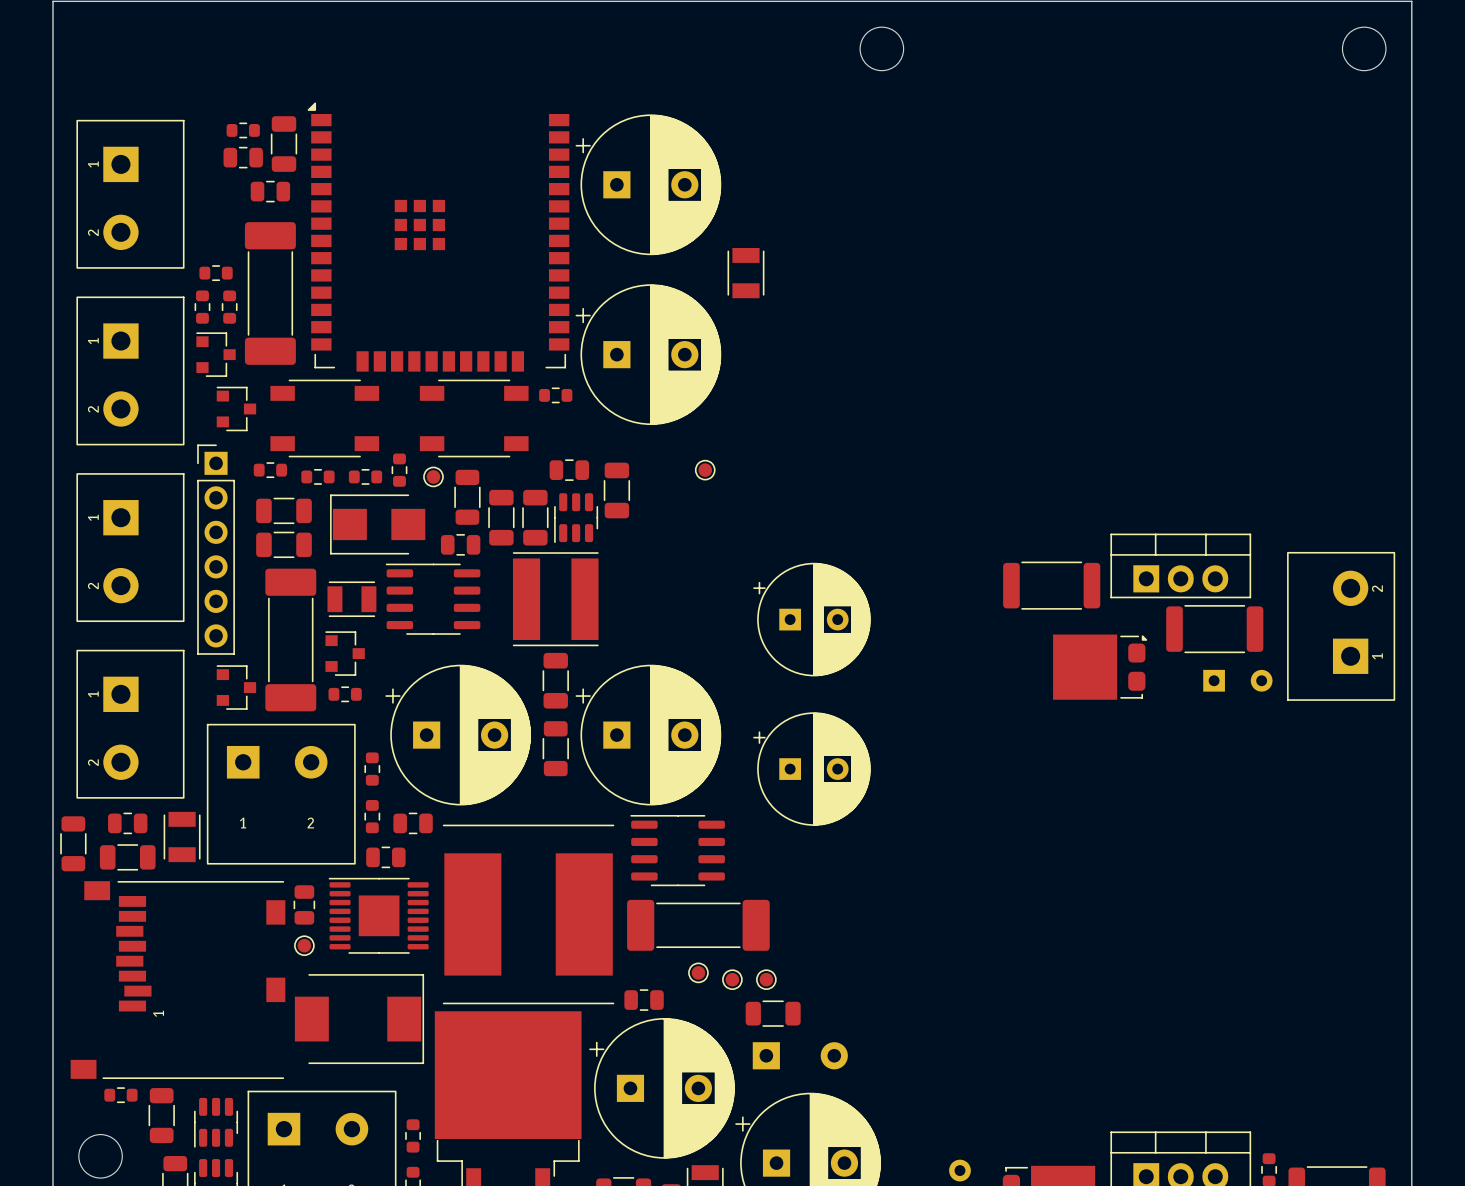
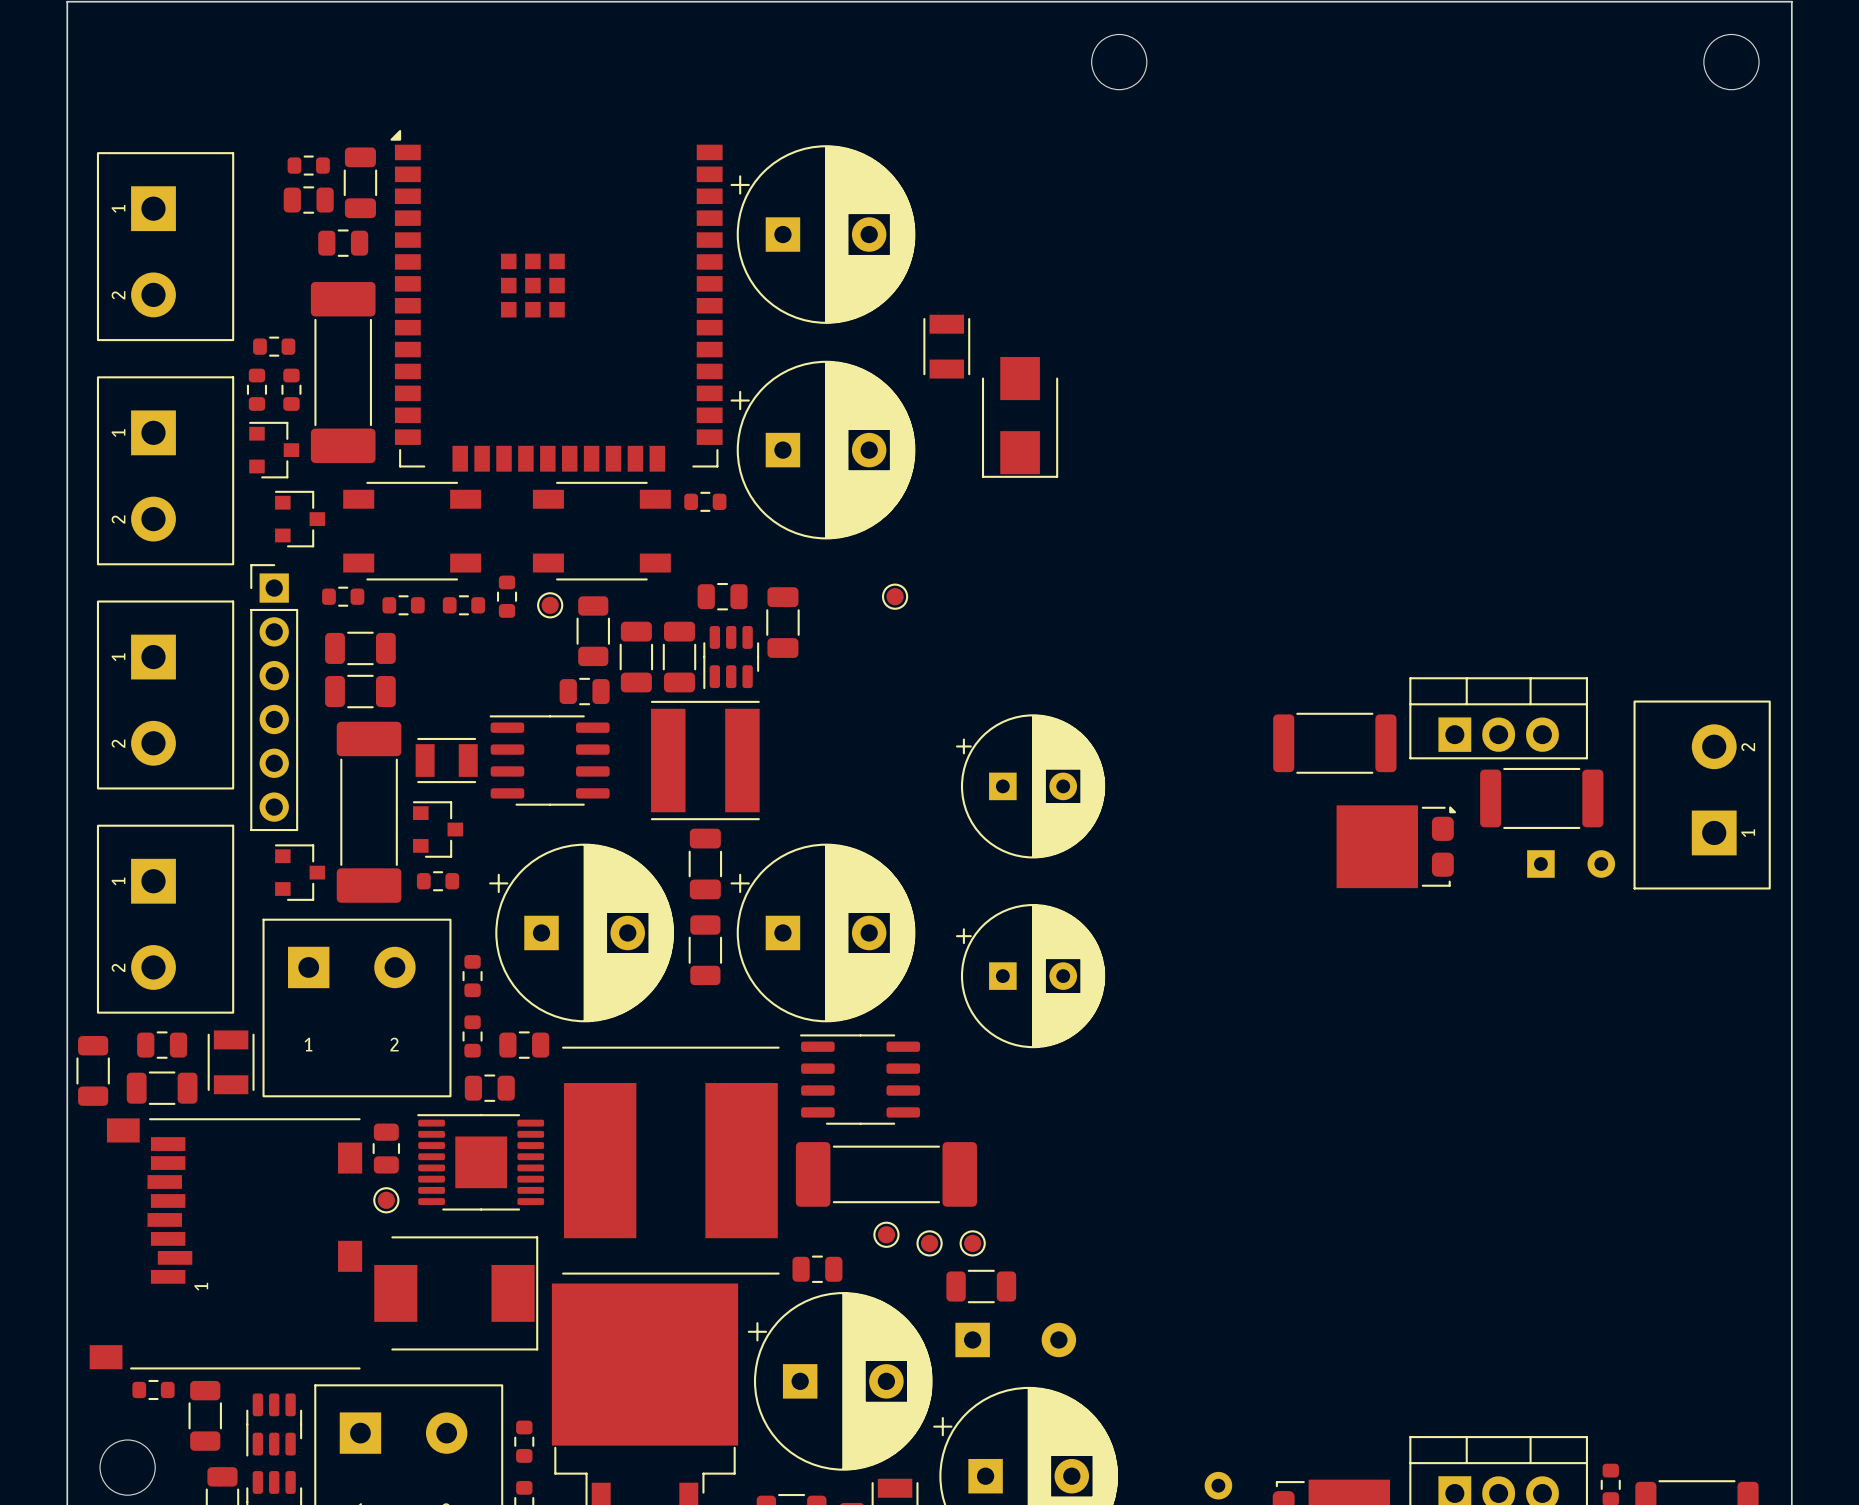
part: none -> (1020, 417)
part: (377, 524) -> none

